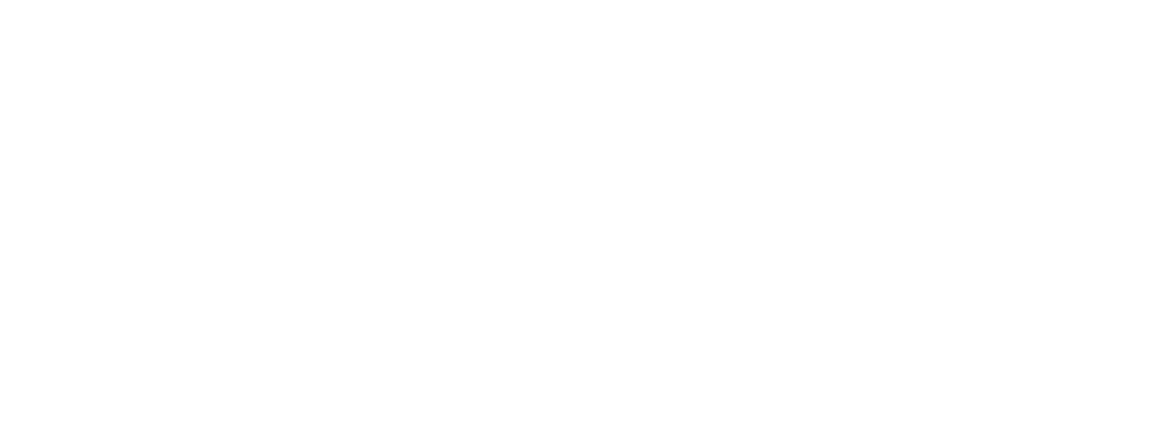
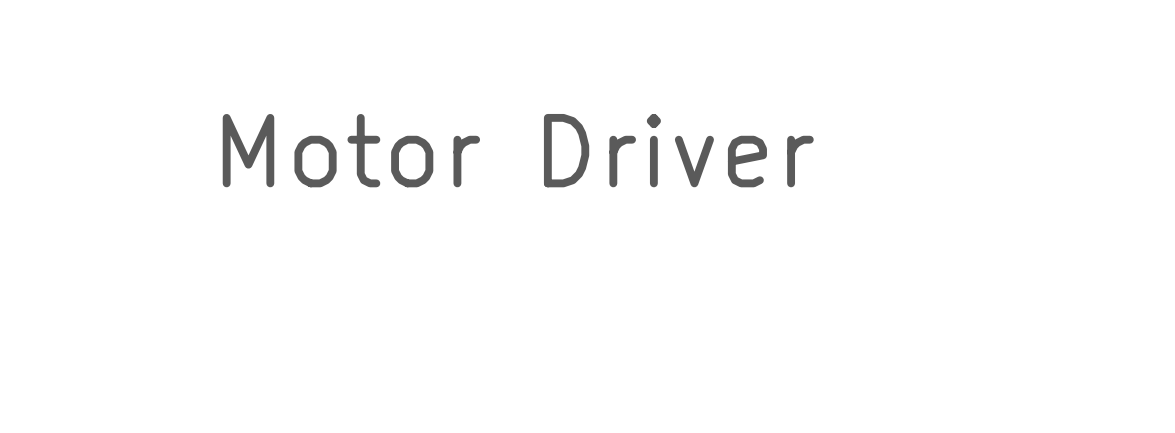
text: none -> Motor Driver (518, 150)

